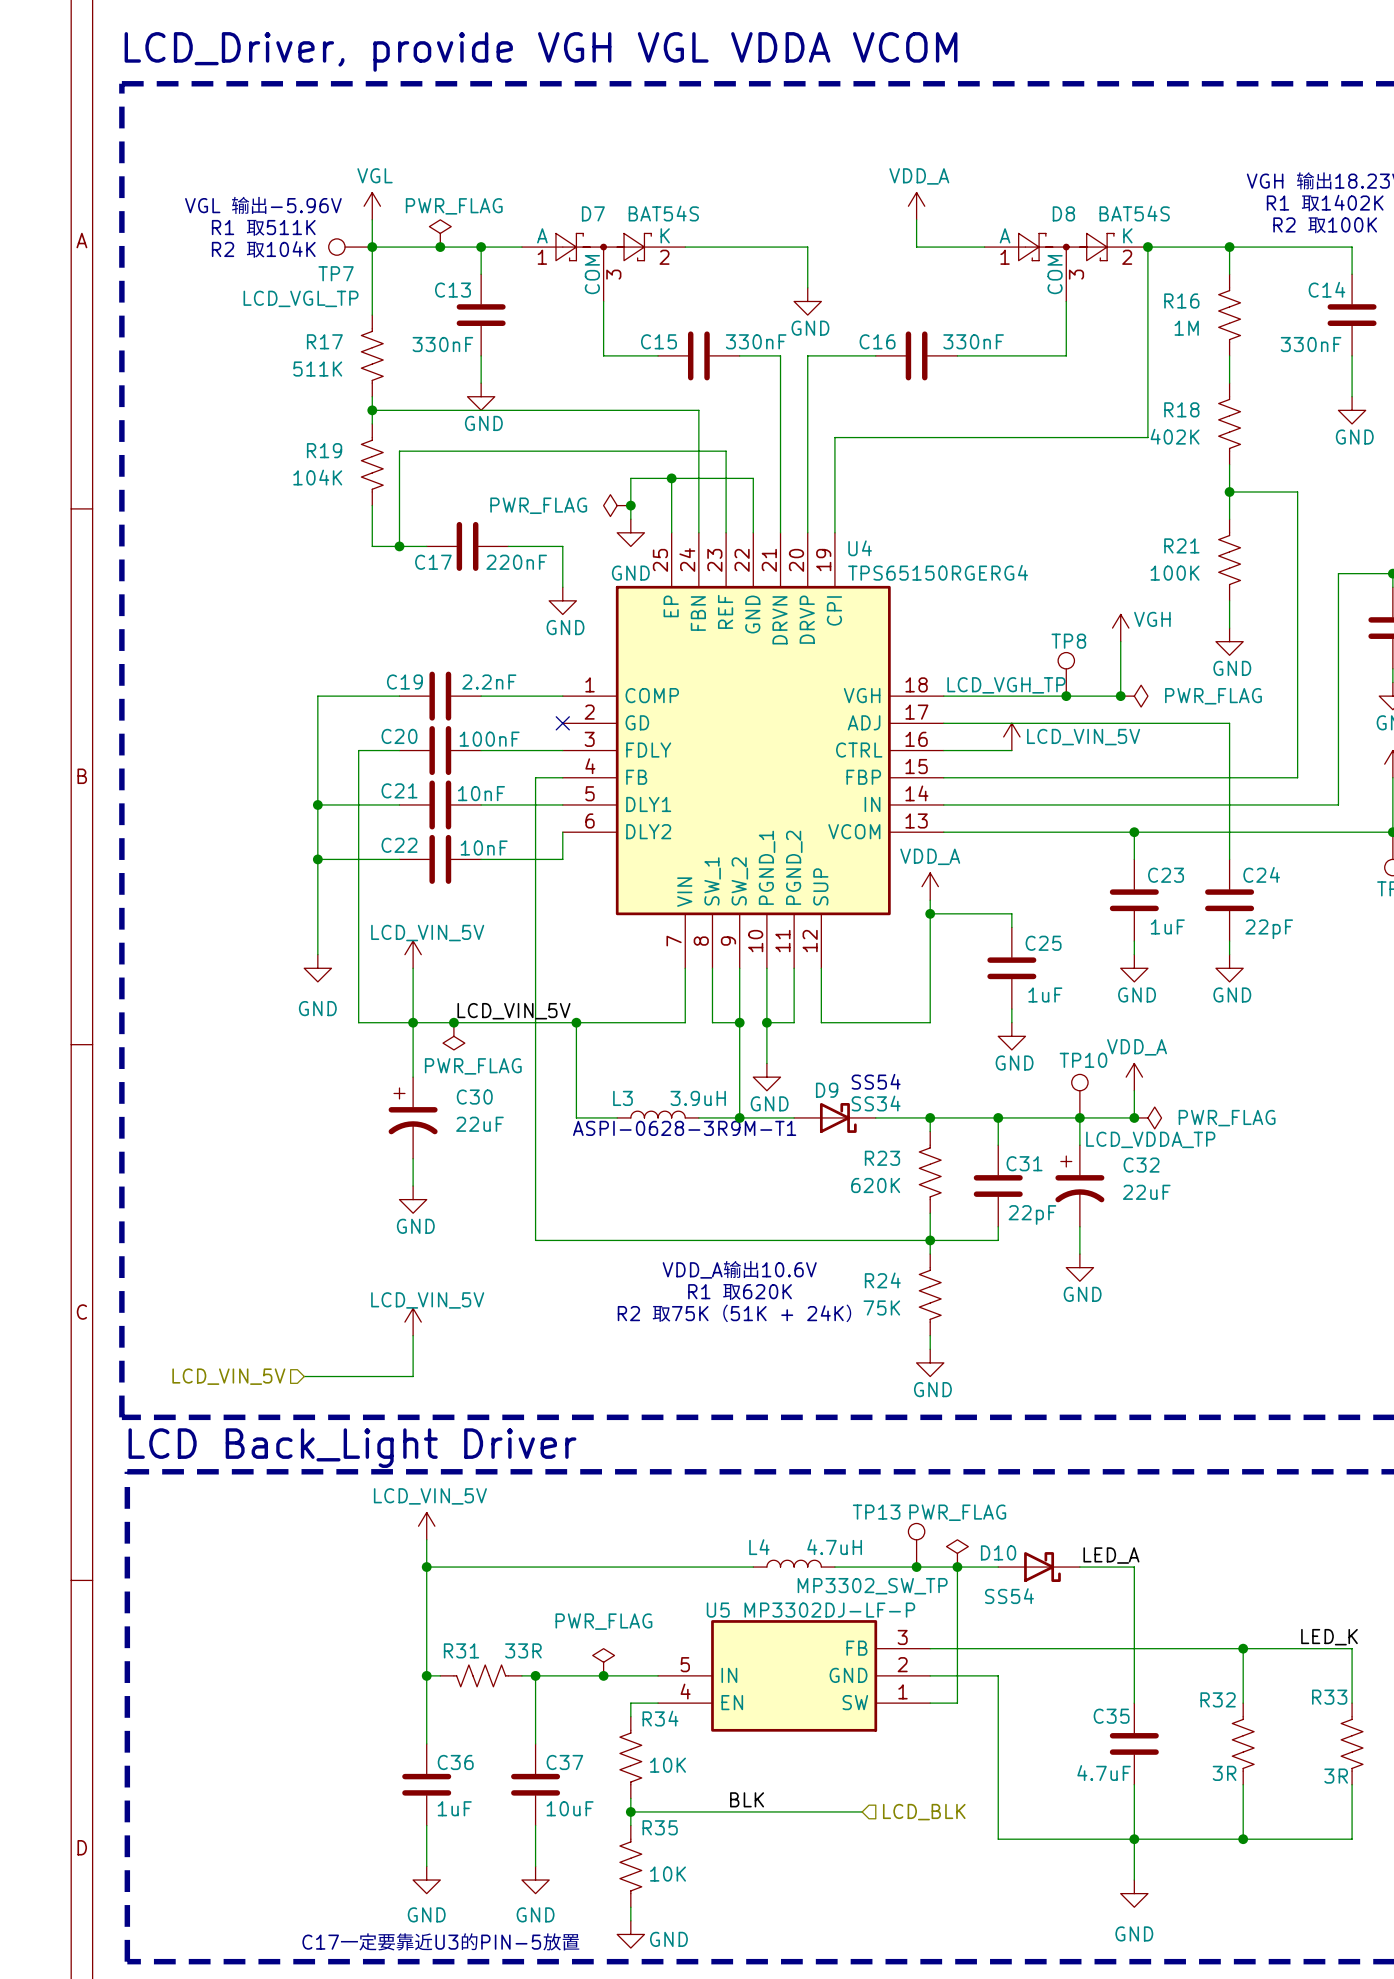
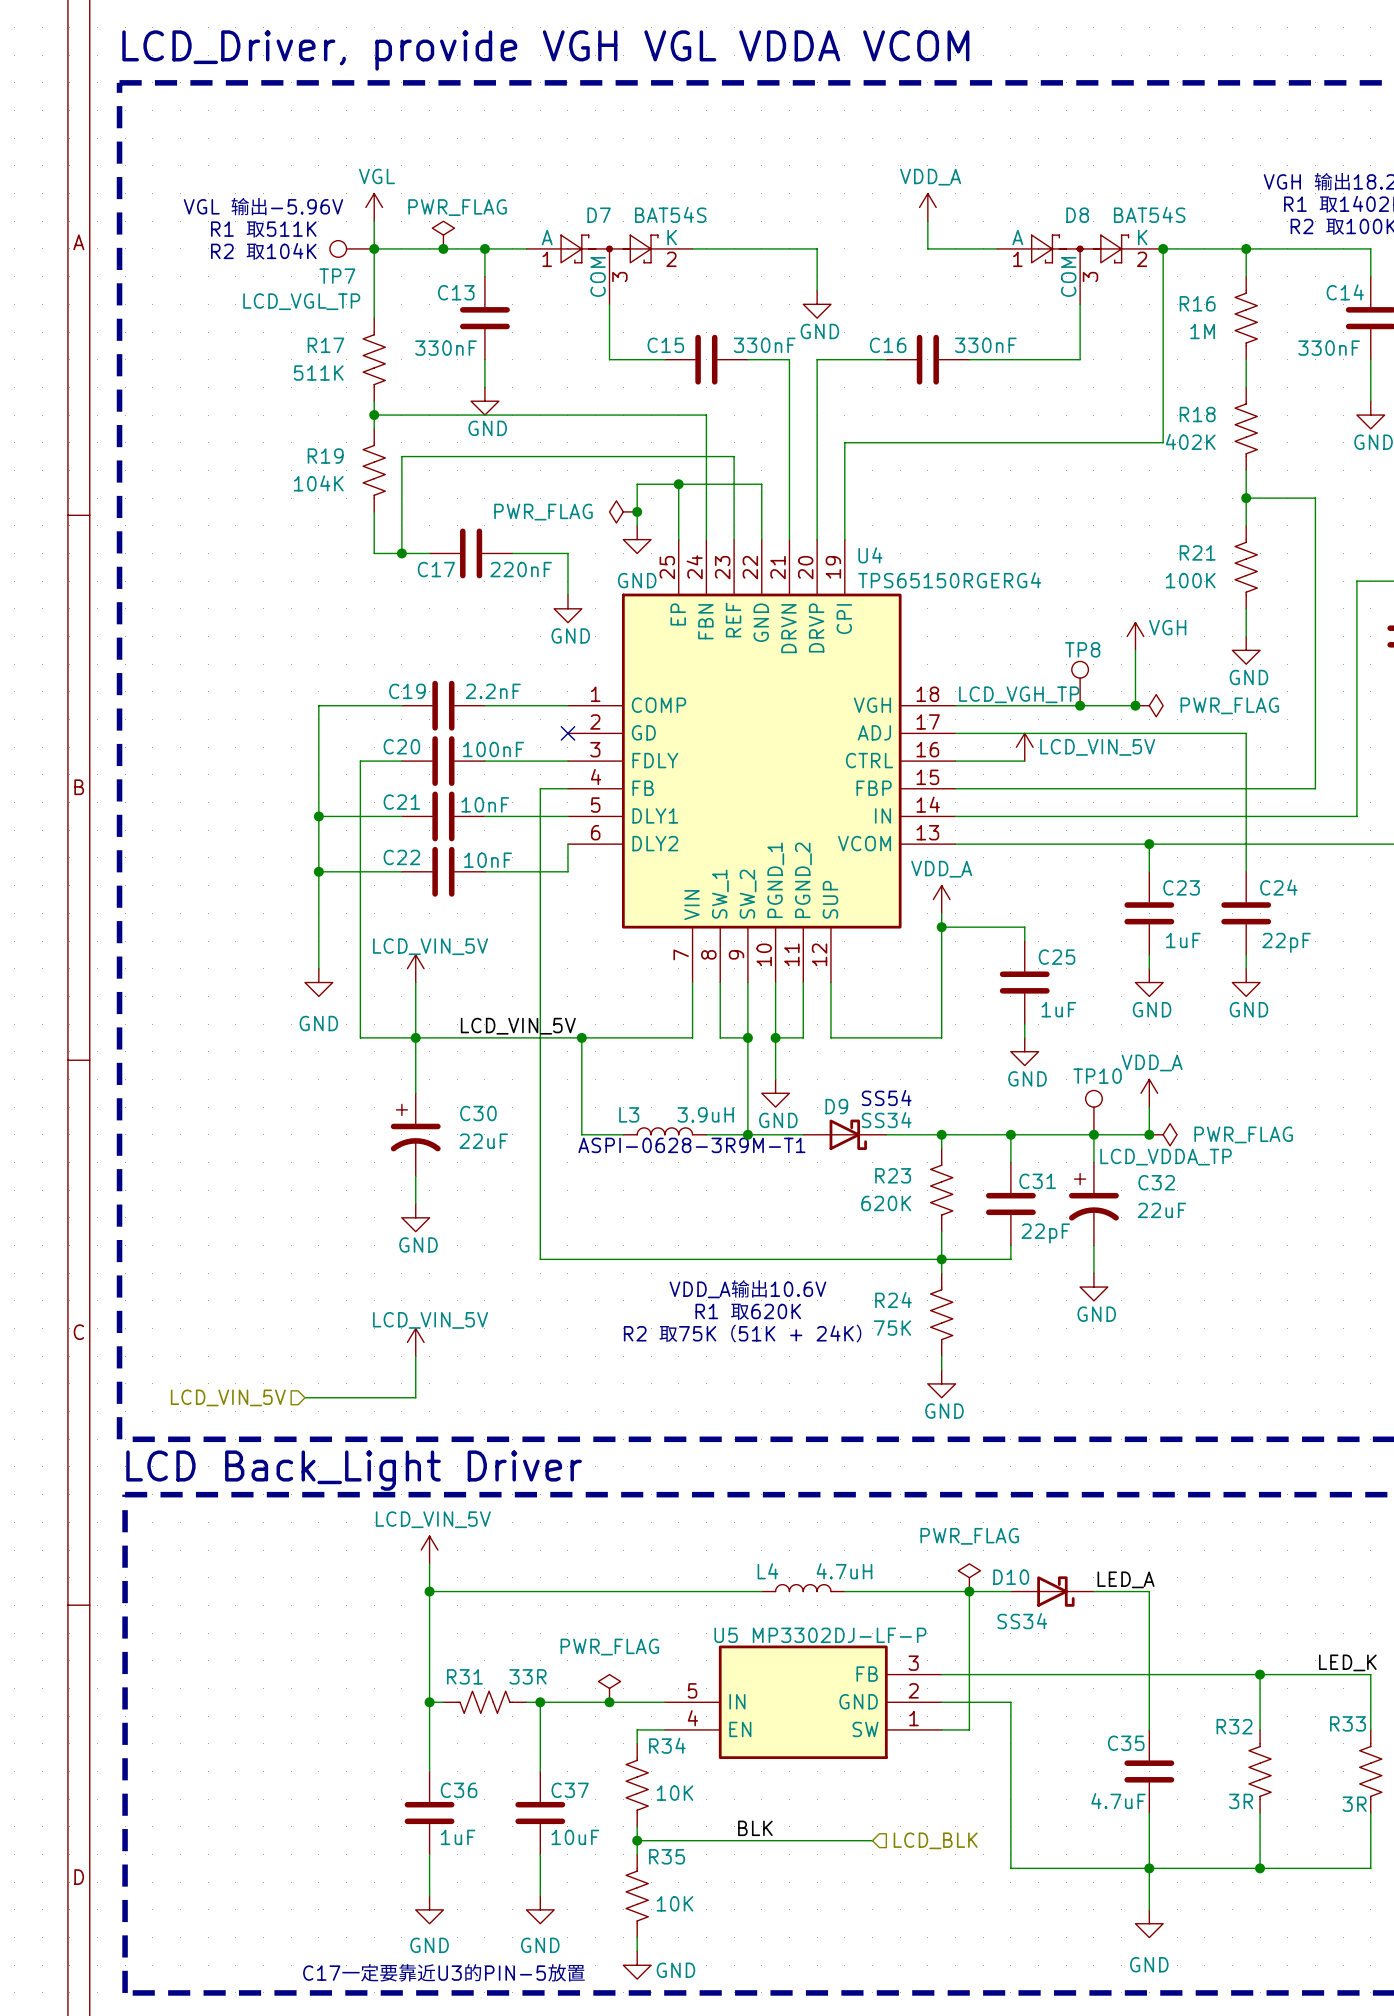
junction: (453, 1022) -> none
power symbol: PWR_FLAG (453, 1036) -> none
TP13: MP3302_SW_TP (916, 1545) -> none
junction: (916, 1567) -> none
D10 value: SS54 (1009, 1596) -> SS34 (1022, 1621)

